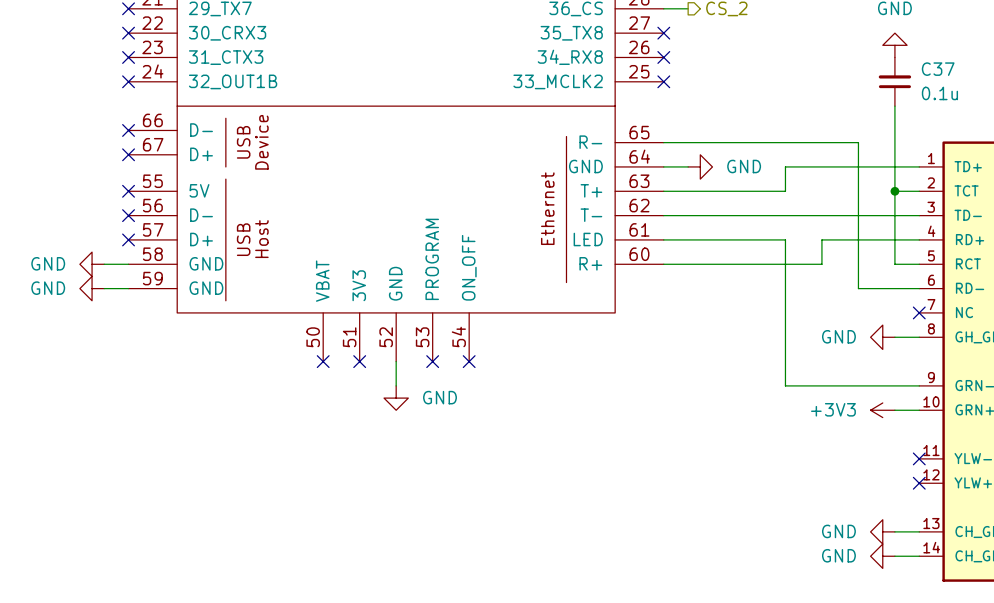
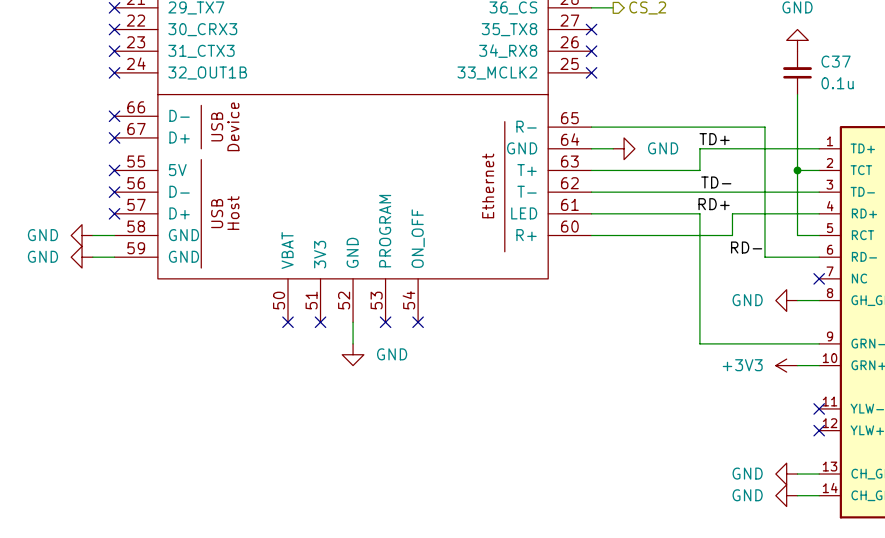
label: none -> TD+ (714, 139)
label: none -> TD- (716, 182)
label: none -> RD+ (714, 204)
label: none -> RD- (746, 247)

